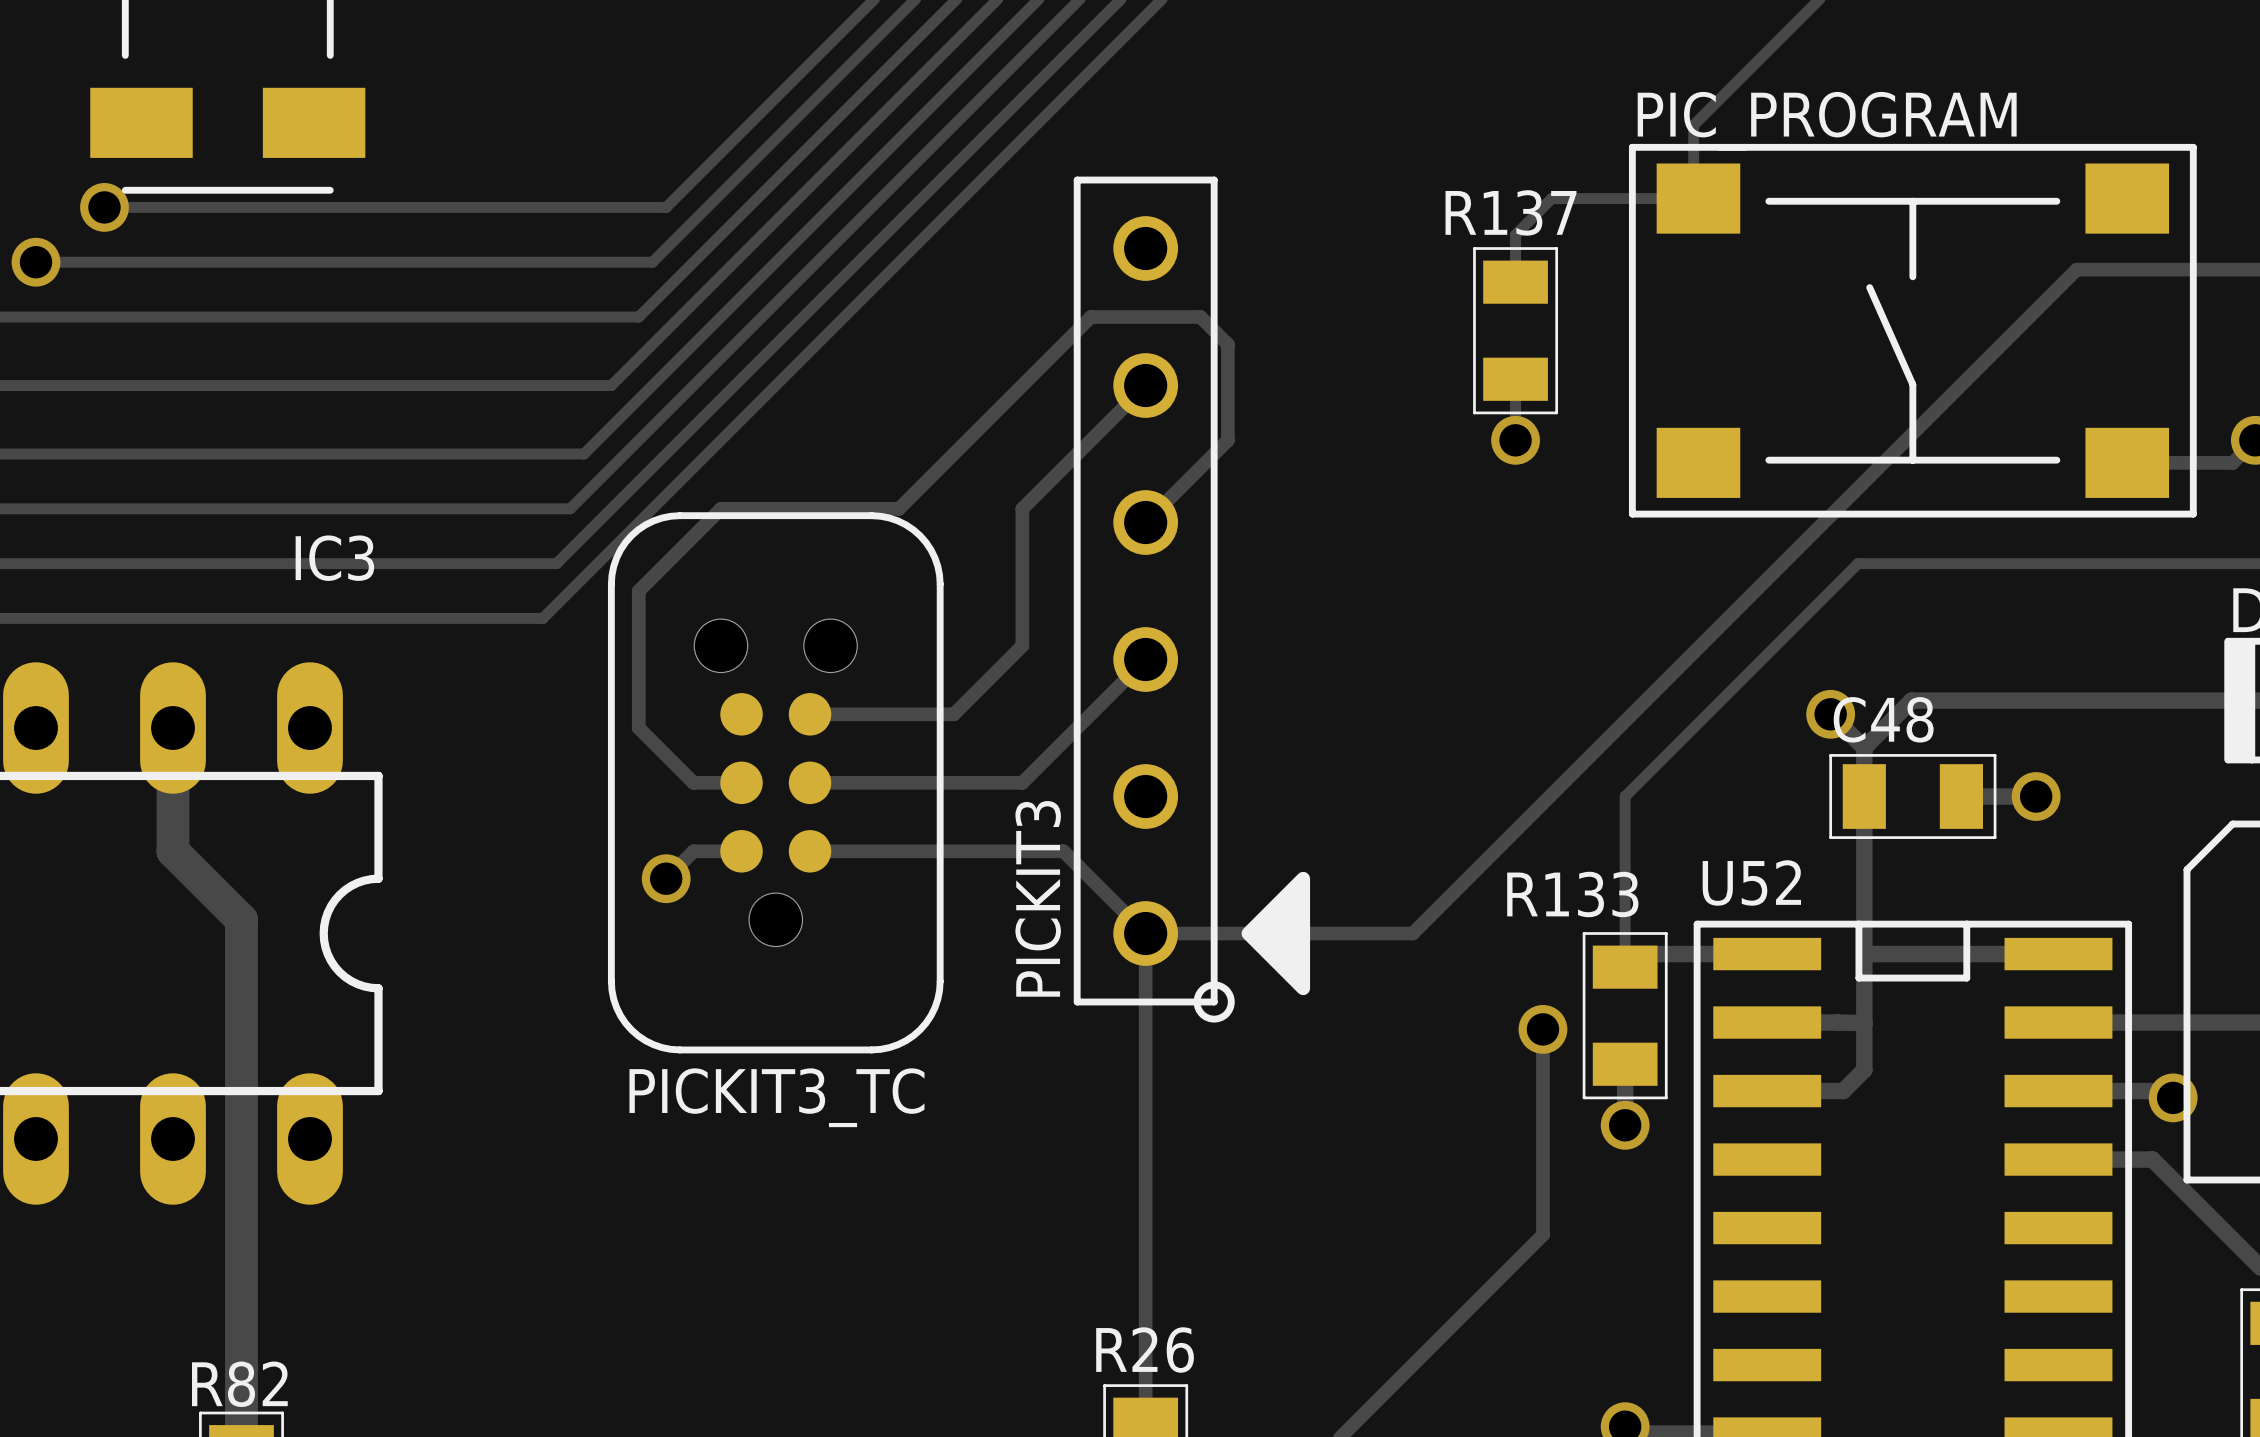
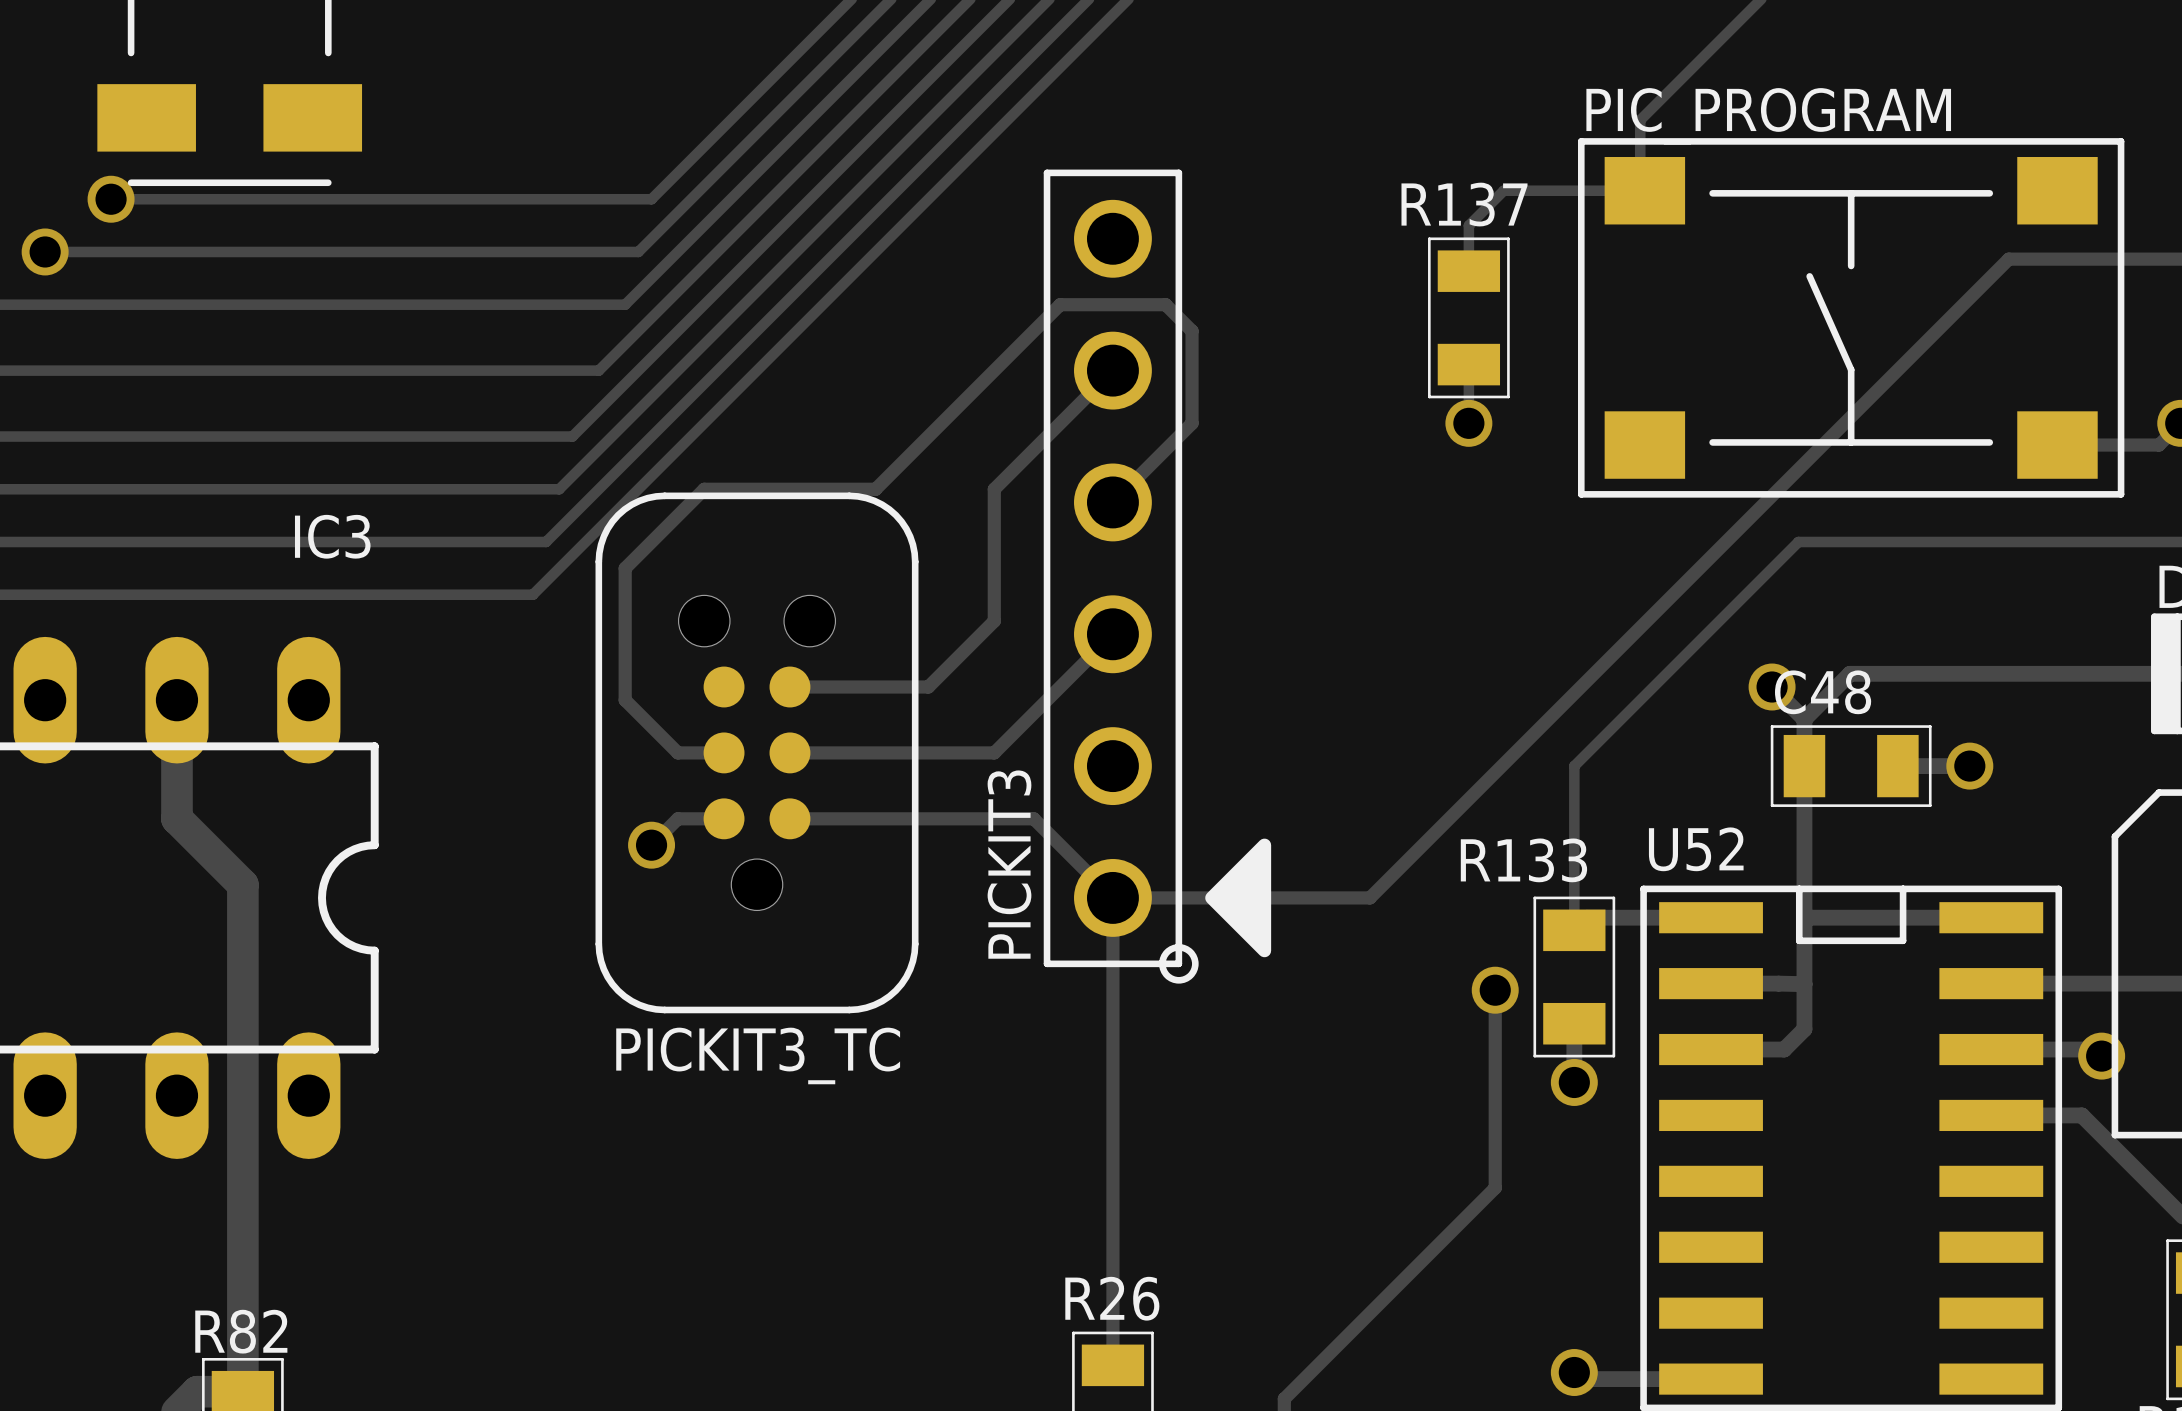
PICKIT3 footprint: [1073, 176, 1235, 1023] -> [1043, 169, 1199, 984]

